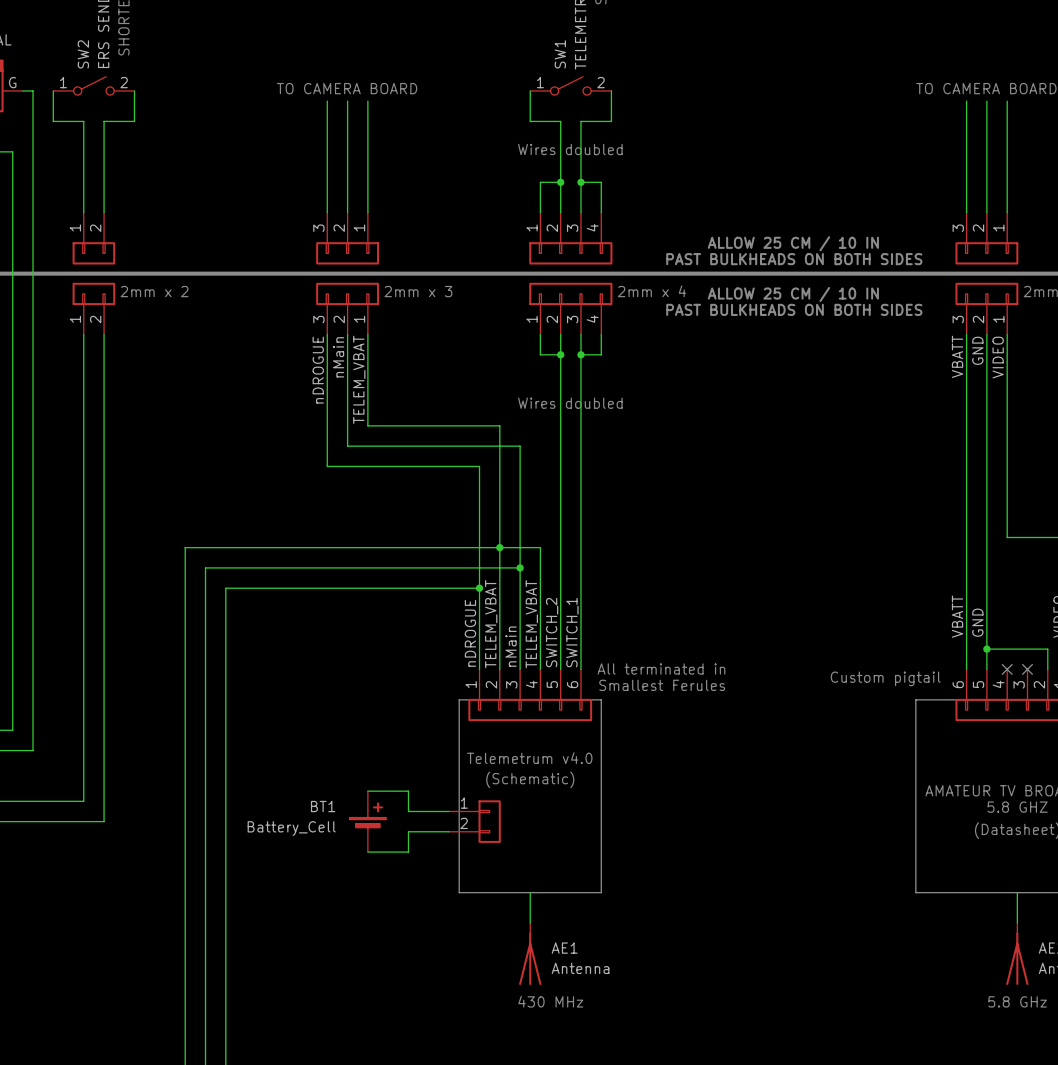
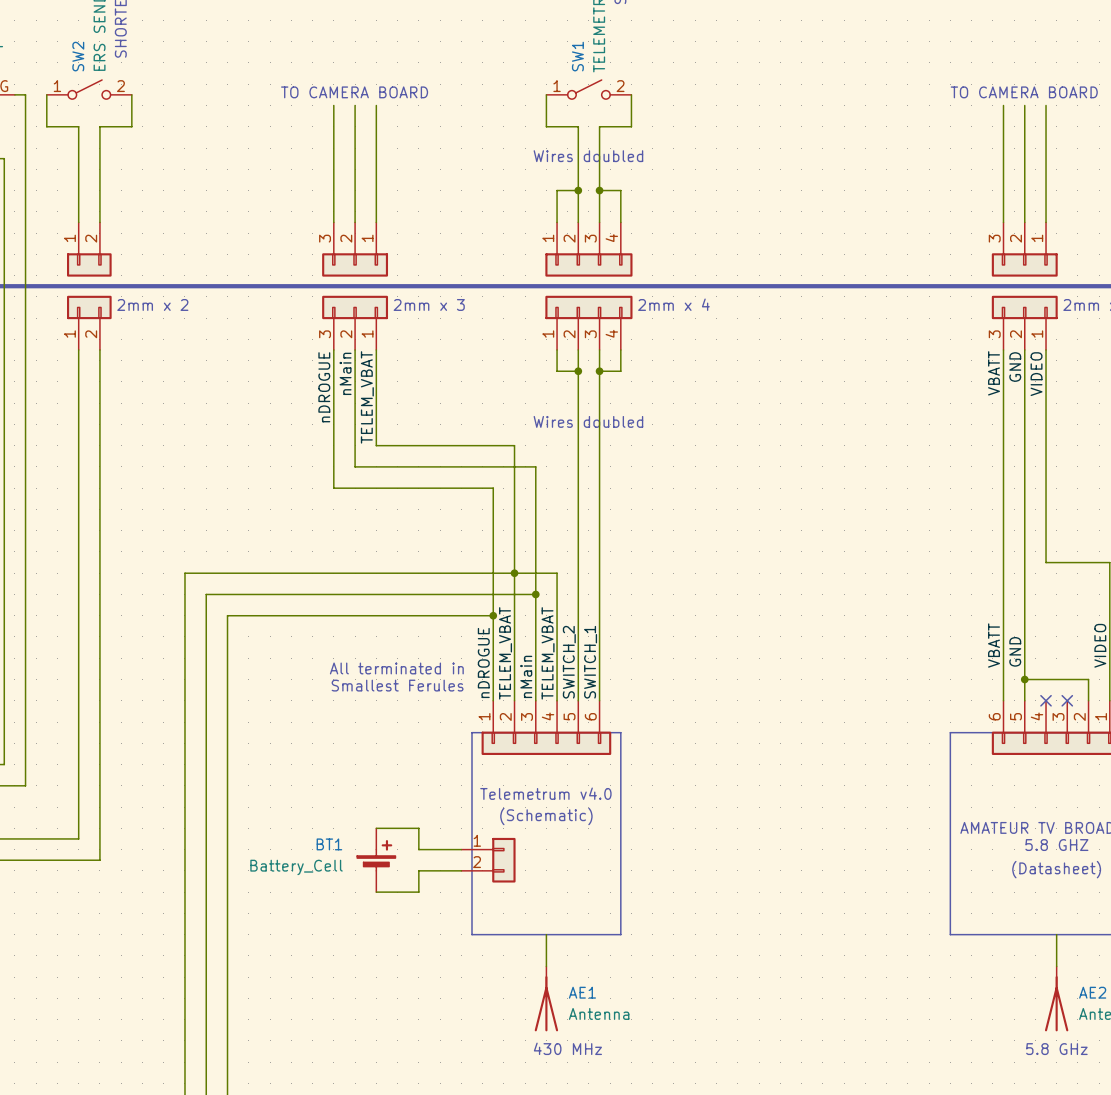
text: ALLOW 25 CM / 10 IN (793, 243) -> none
text: PAST BULKHEADS ON BOTH SIDES (794, 259) -> none
text: ALLOW 25 CM / 10 IN (793, 294) -> none
text: PAST BULKHEADS ON BOTH SIDES (794, 309) -> none
text: none -> All terminated in (396, 668)
text: none -> Smallest Ferules (397, 685)
text: All terminated in (661, 669) -> none
text: Custom pigtail (885, 678) -> none
text: Smallest Ferules (662, 685) -> none

